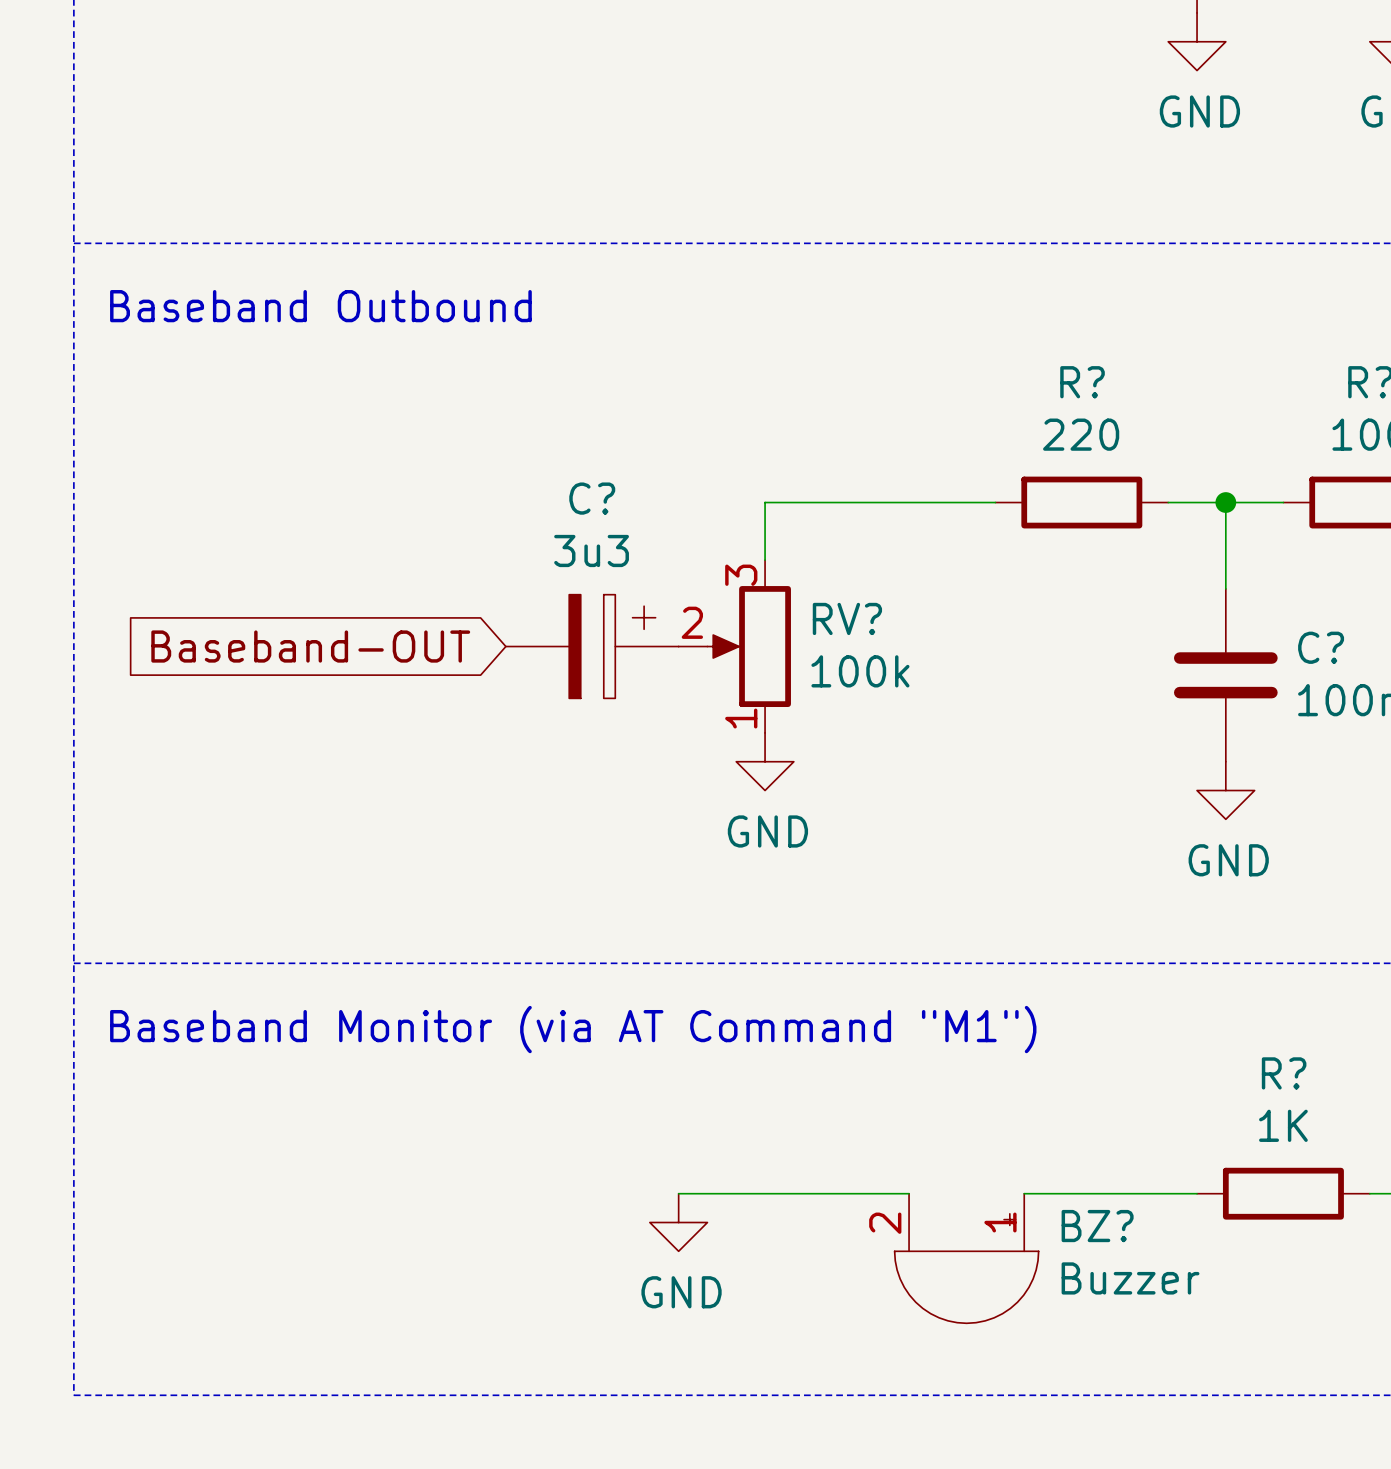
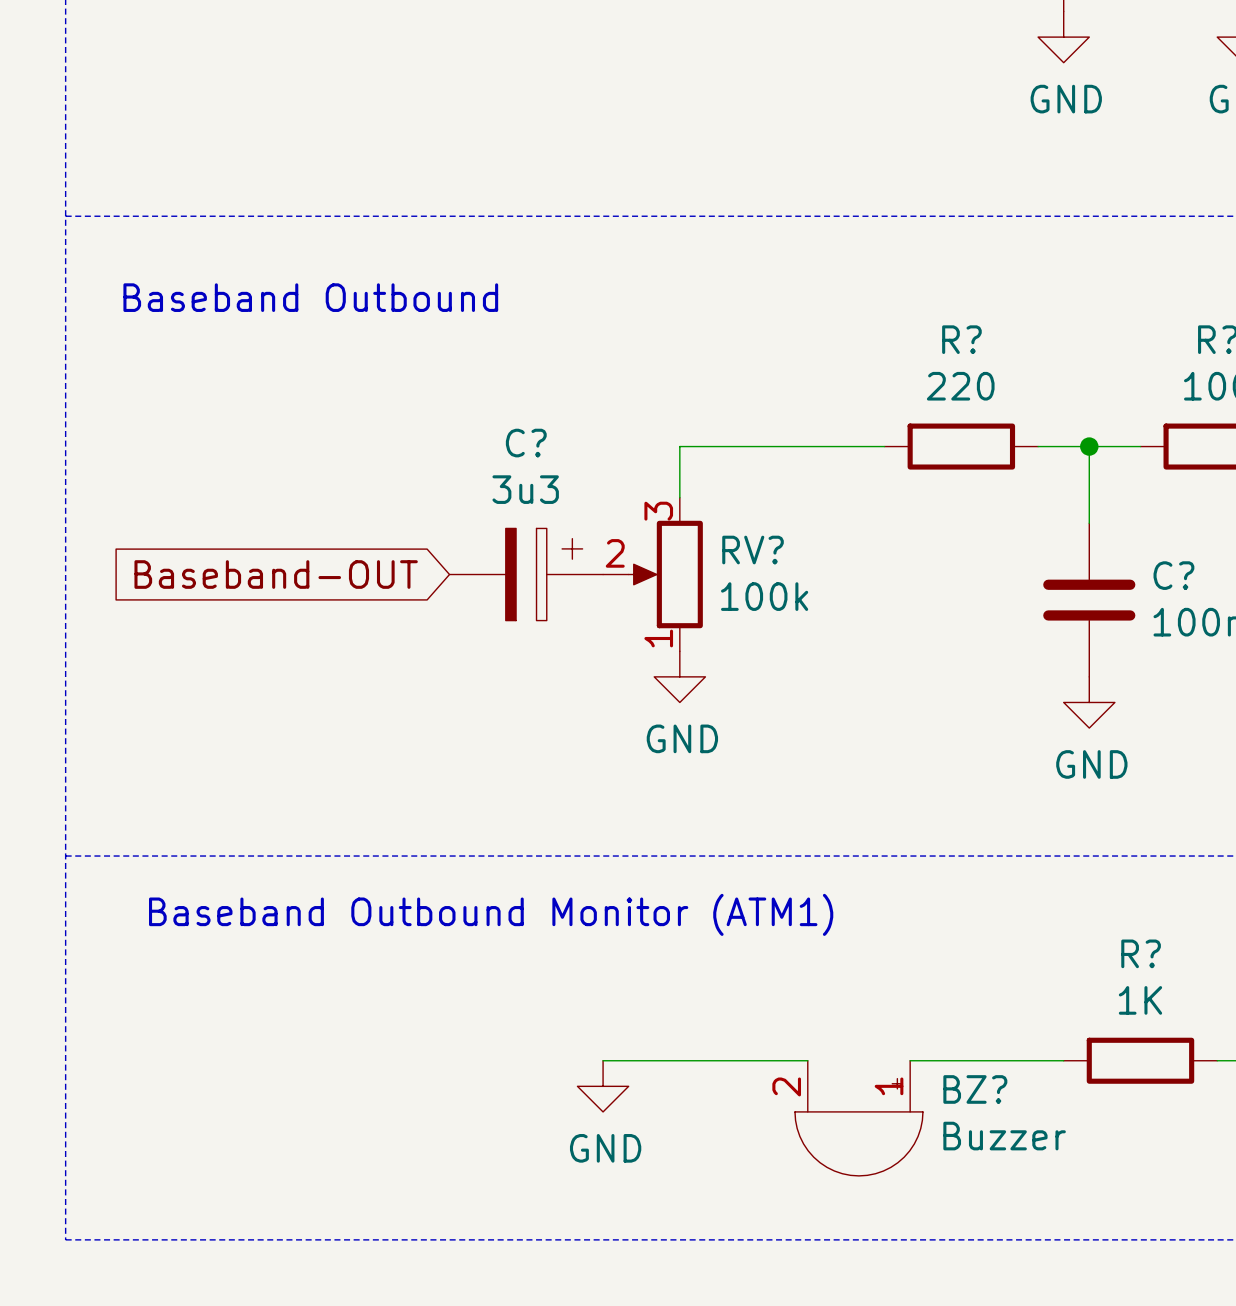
text position: Baseband Outbound (320, 306) -> Baseband Outbound (310, 297)
text: Baseband Monitor (via AT Command "M1") (573, 1029) -> Baseband Outbound Monitor (ATM1) (491, 914)

